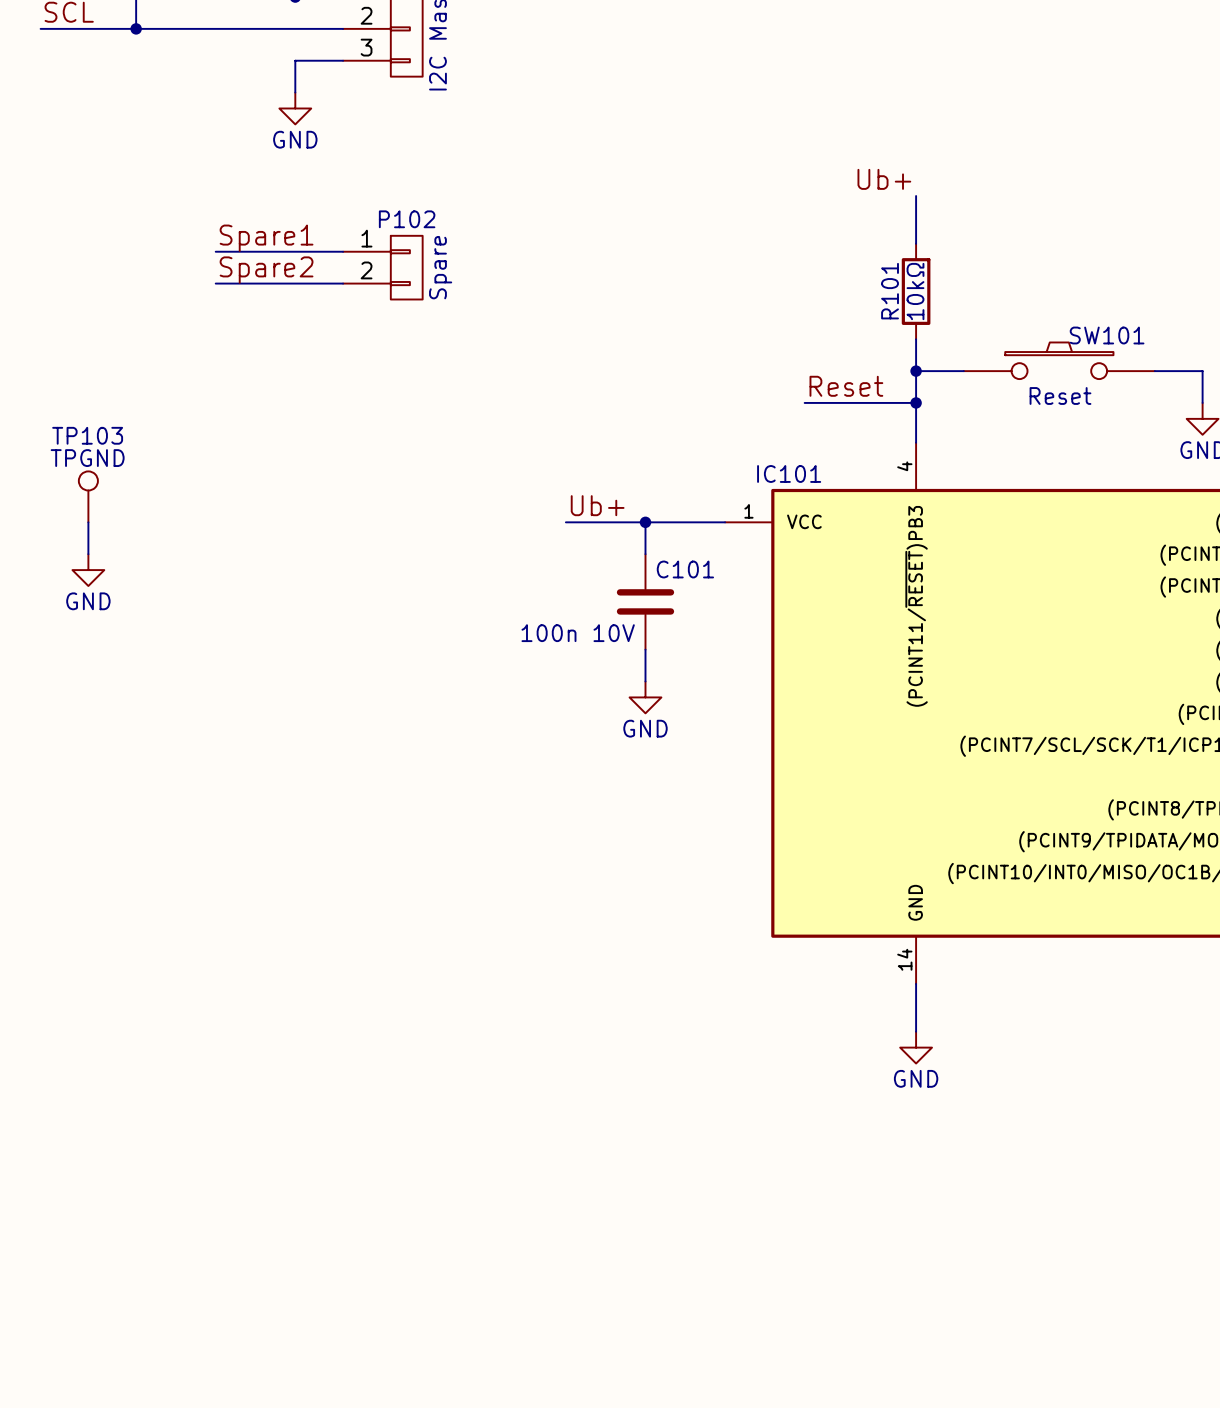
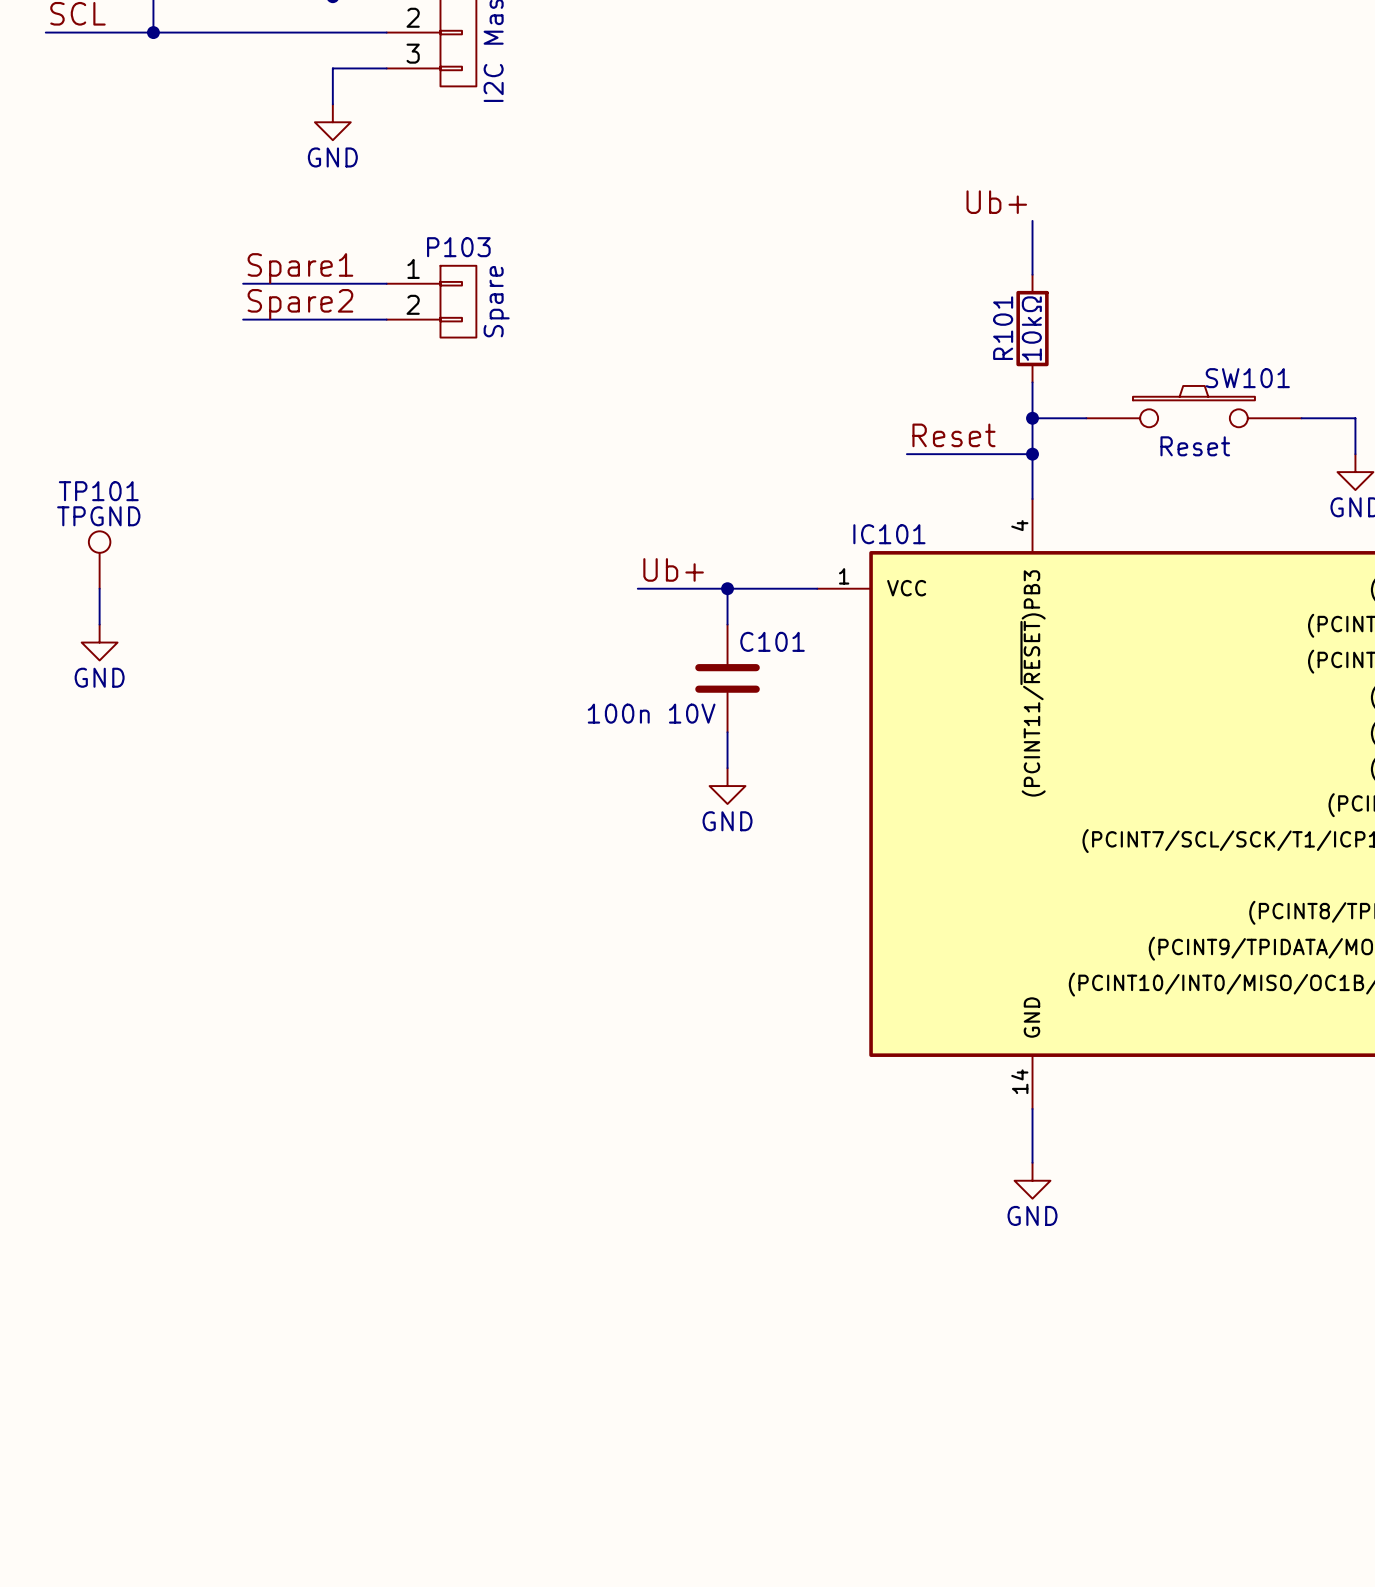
P102 name: P102 (407, 219) -> P103 (458, 247)
TP103 name: TP103 (87, 435) -> TP101 (98, 491)

